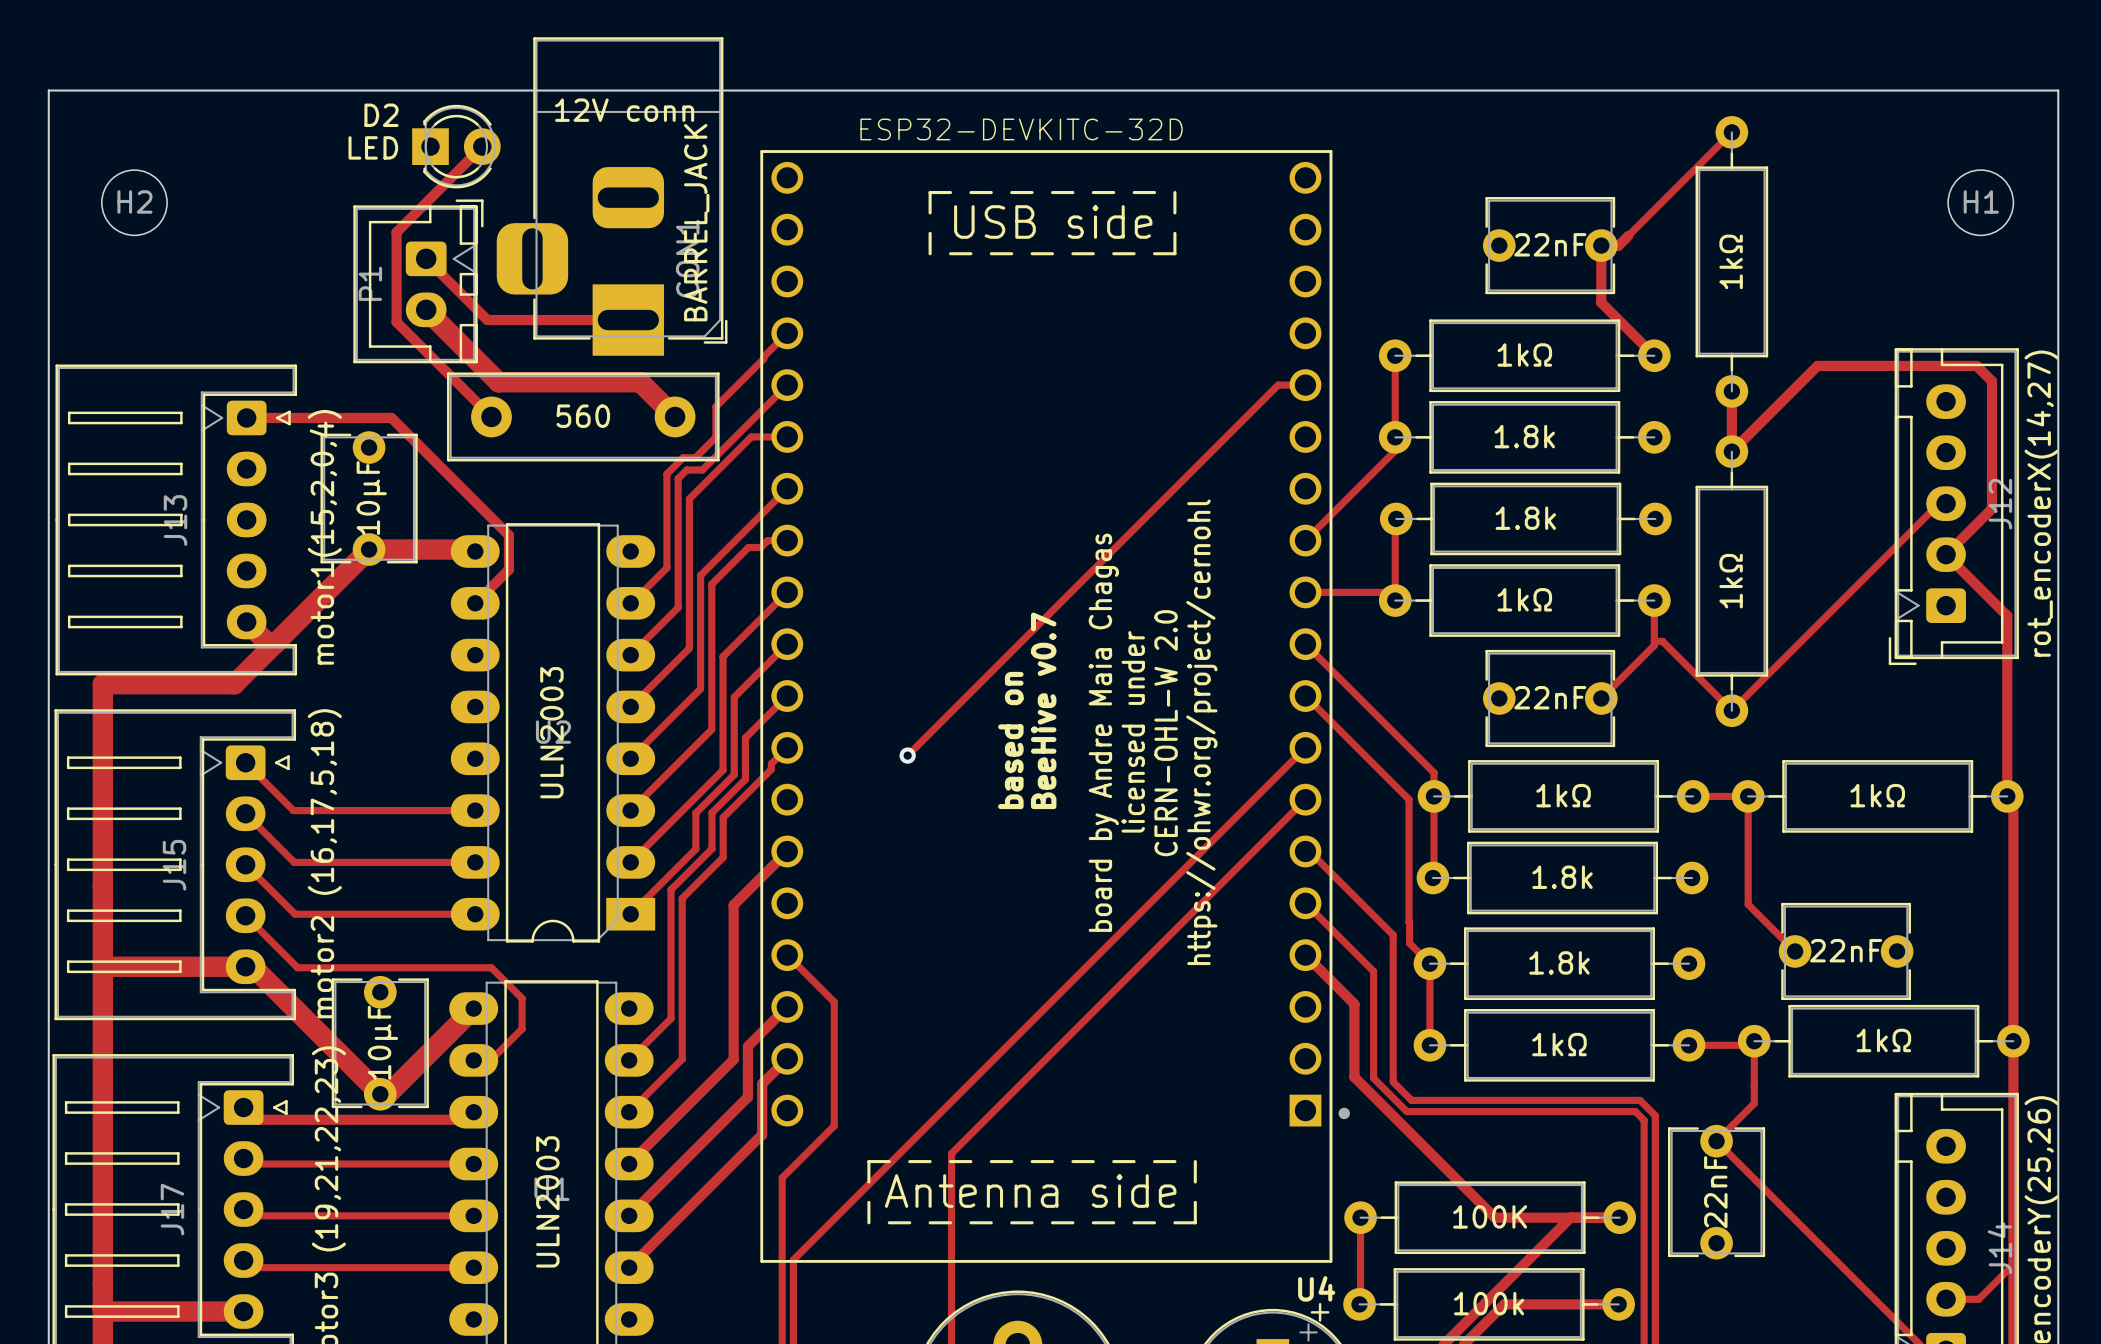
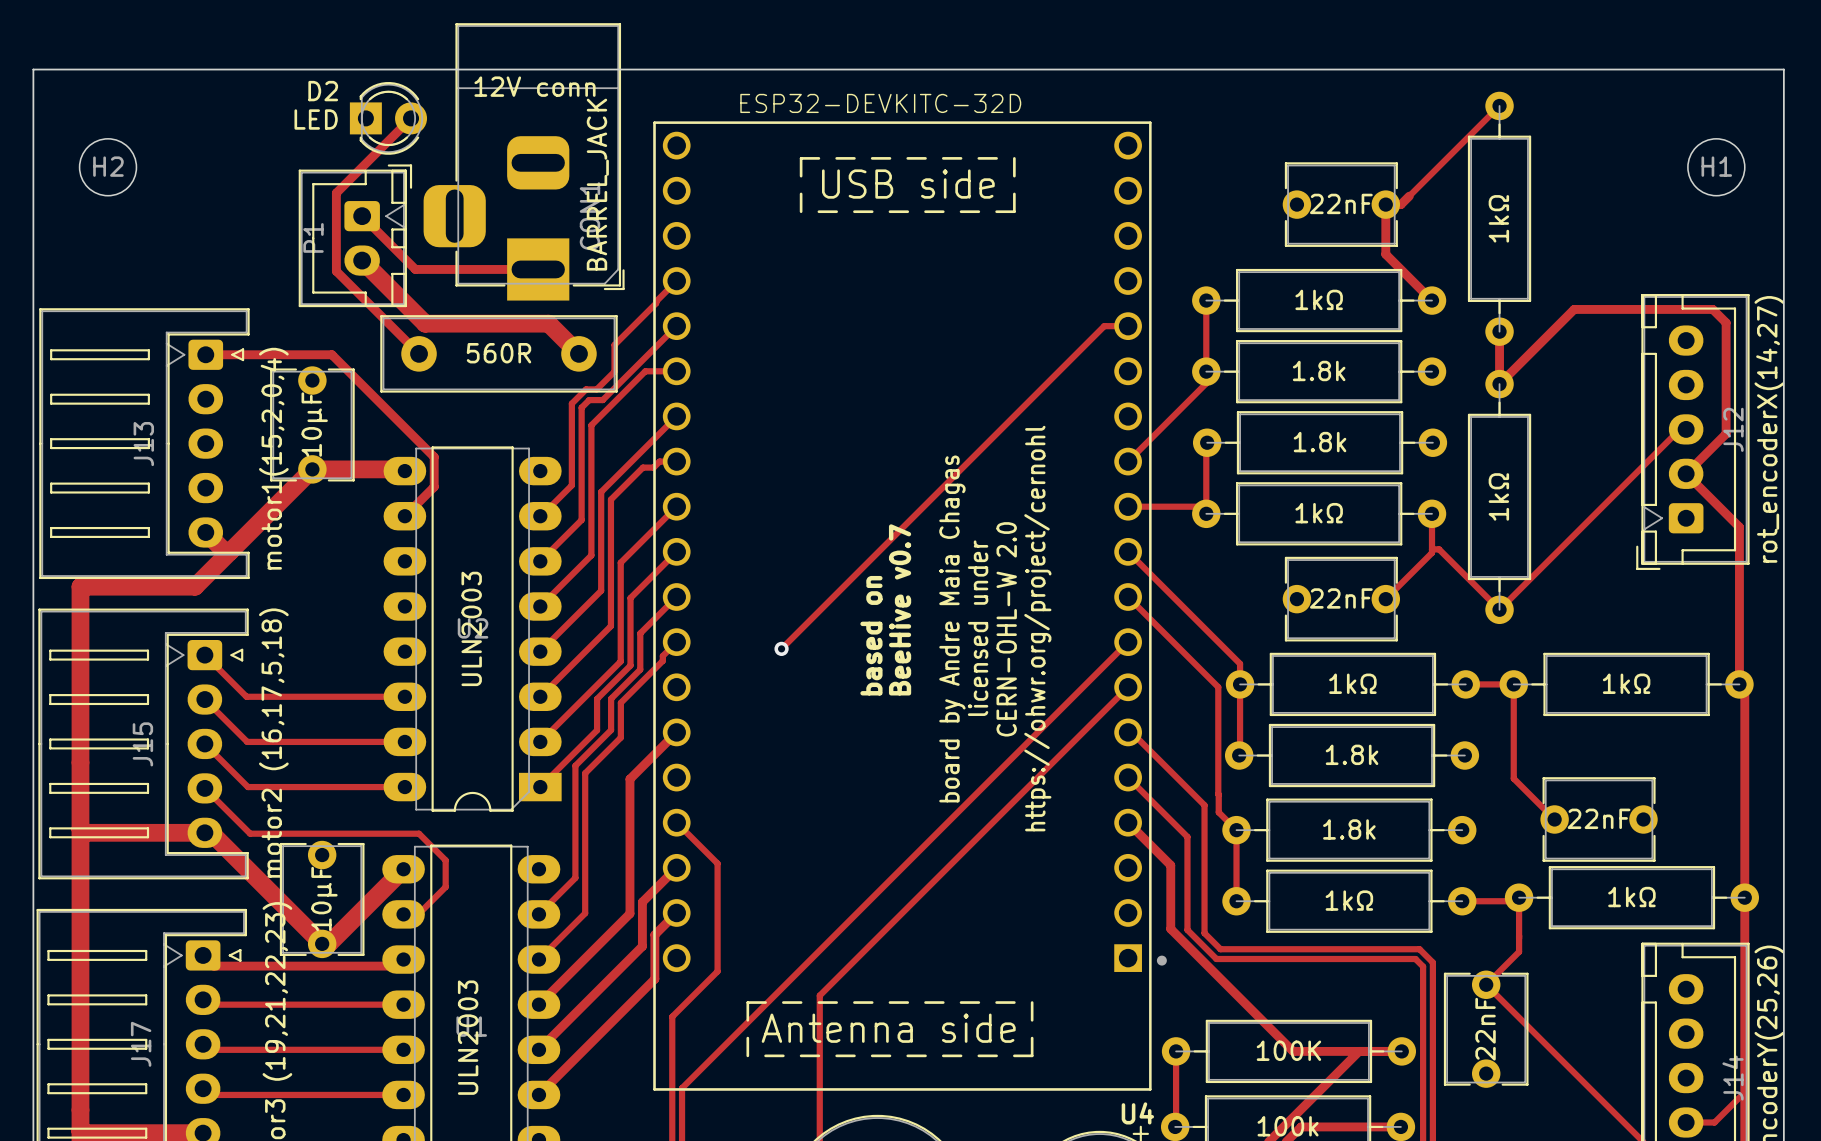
part value: 560 (583, 416) -> 560R (498, 353)

